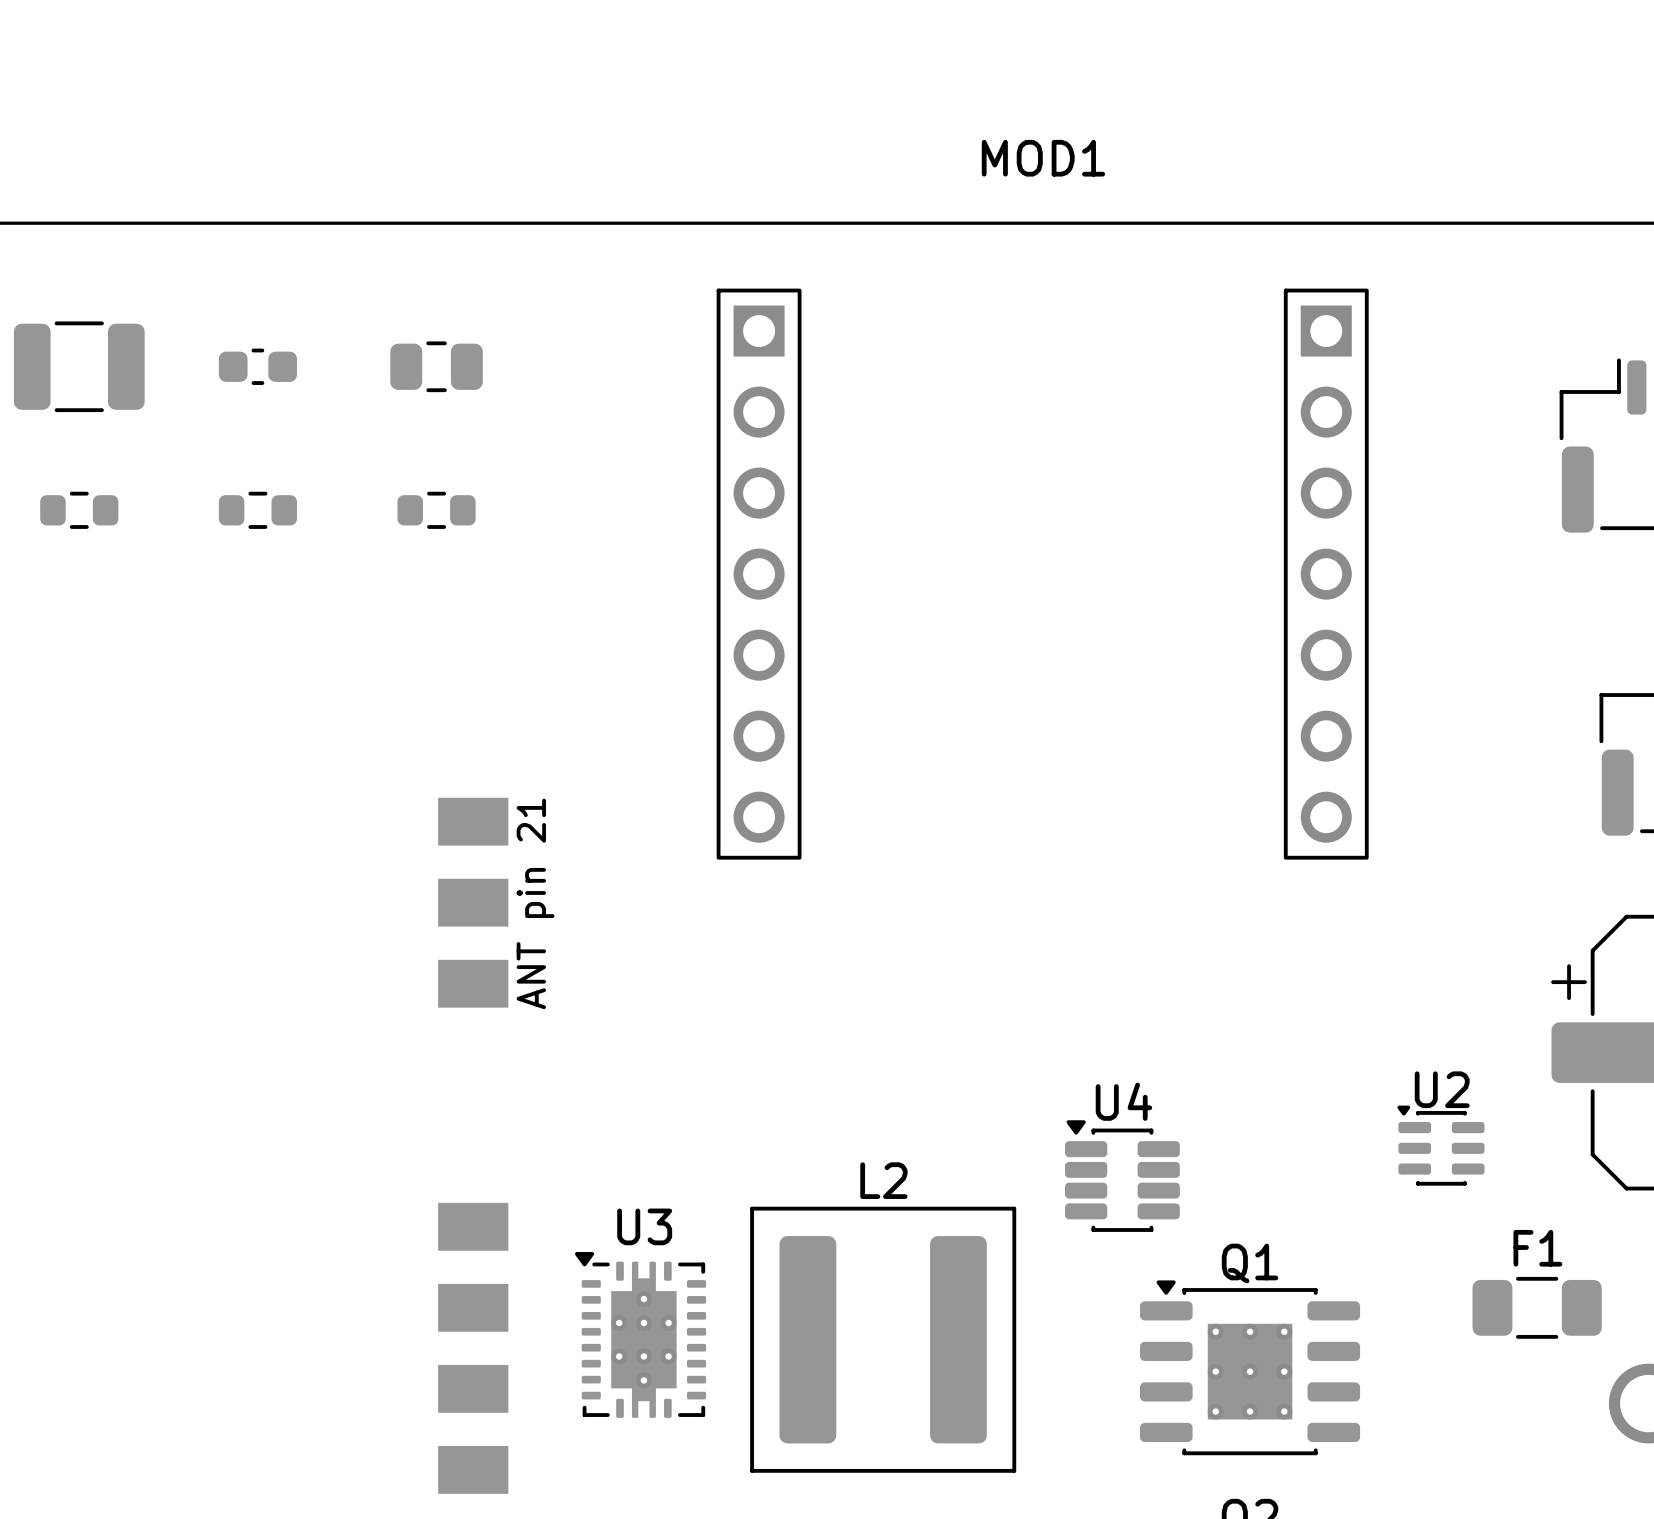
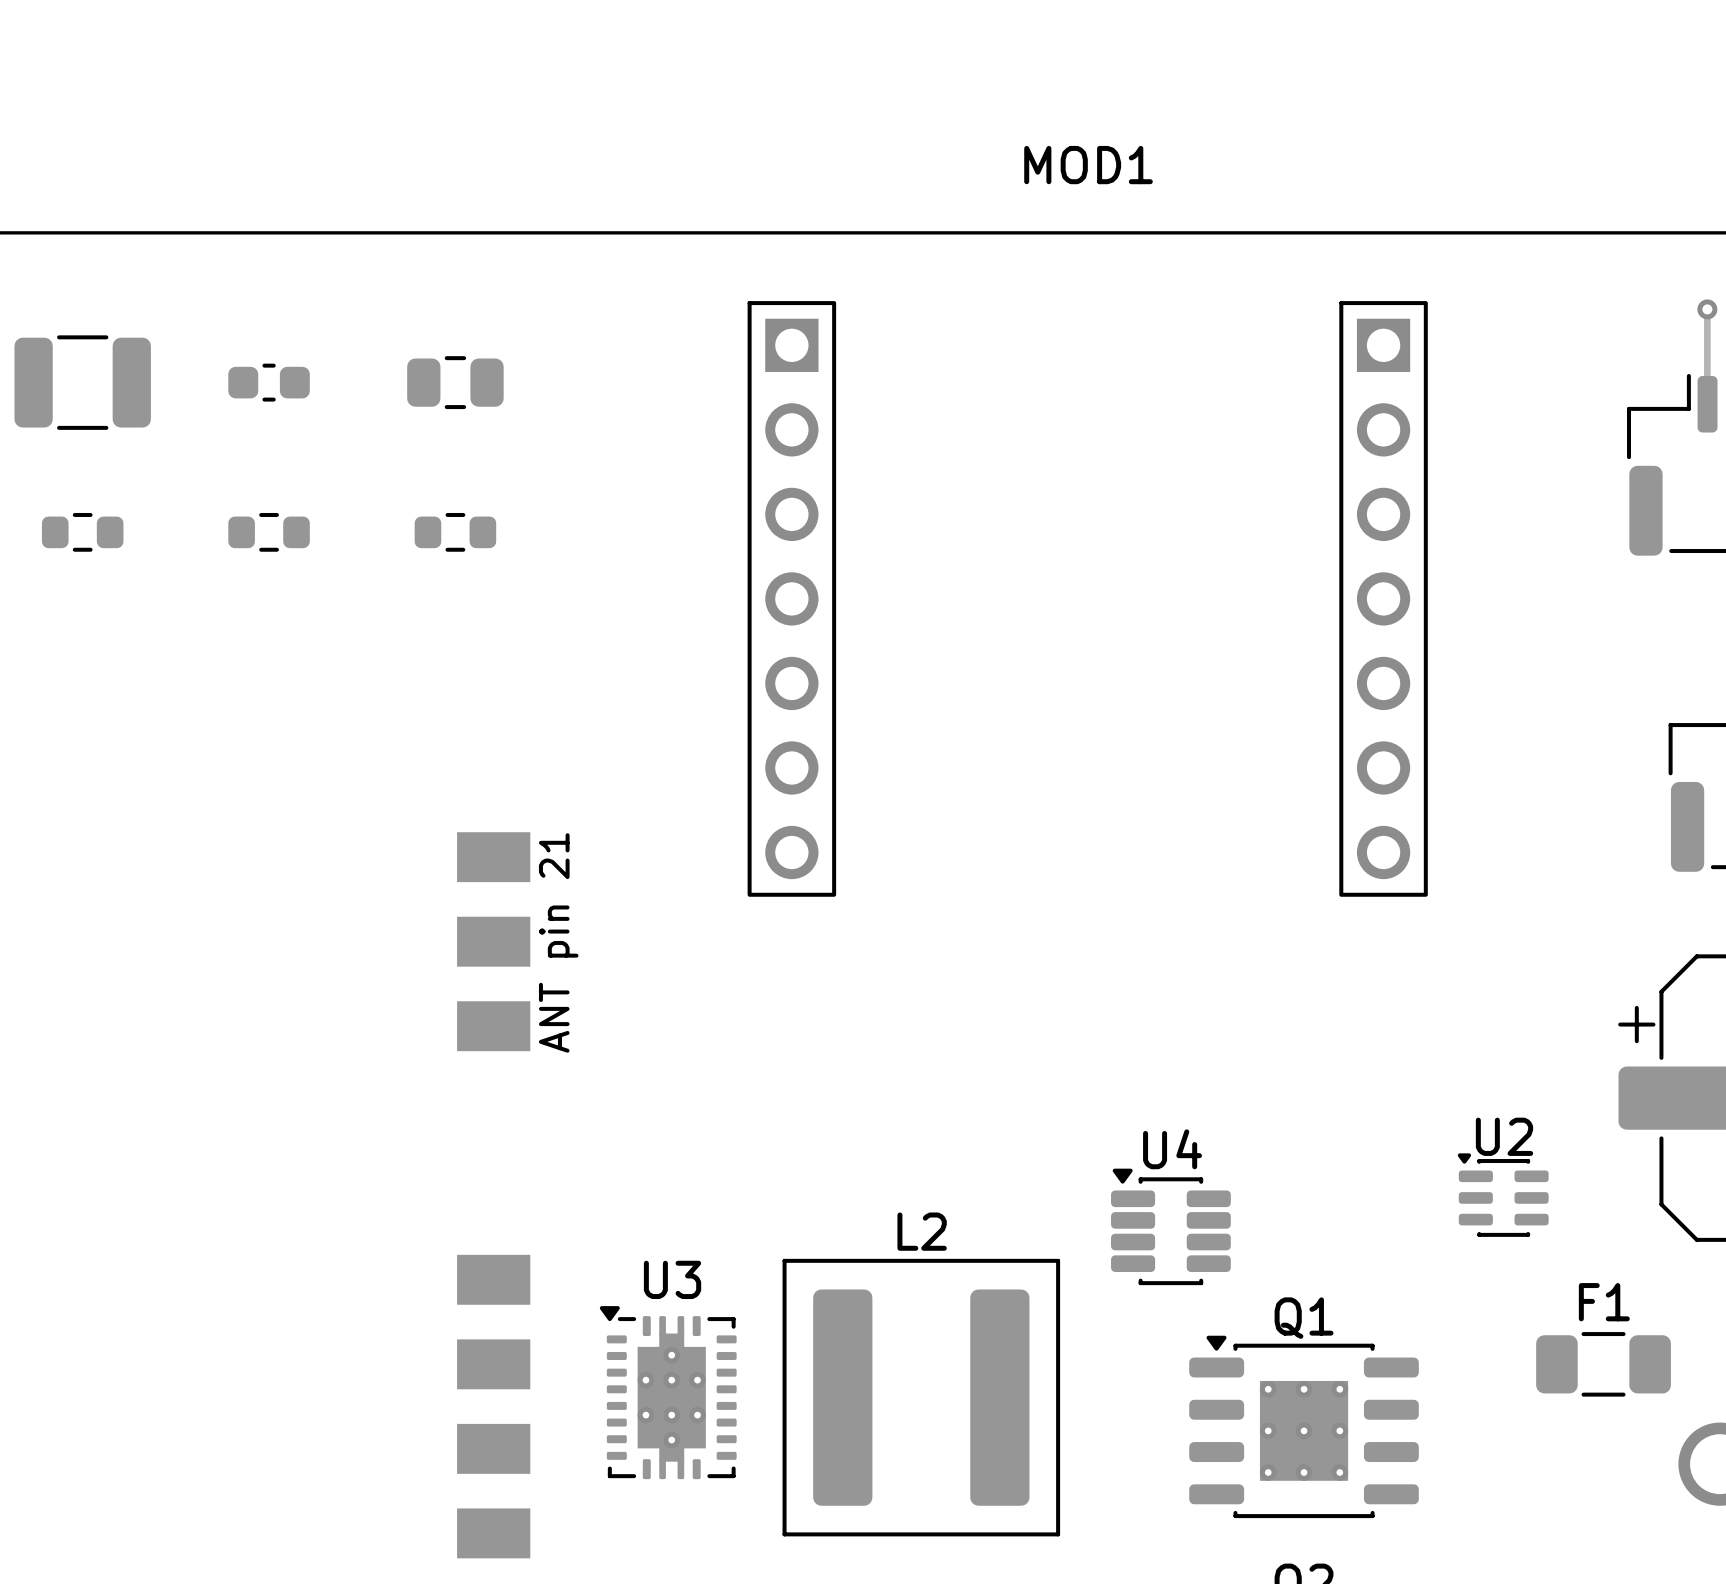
track: none -> (1707, 309) (1707, 404)
via: none -> (1707, 309)

